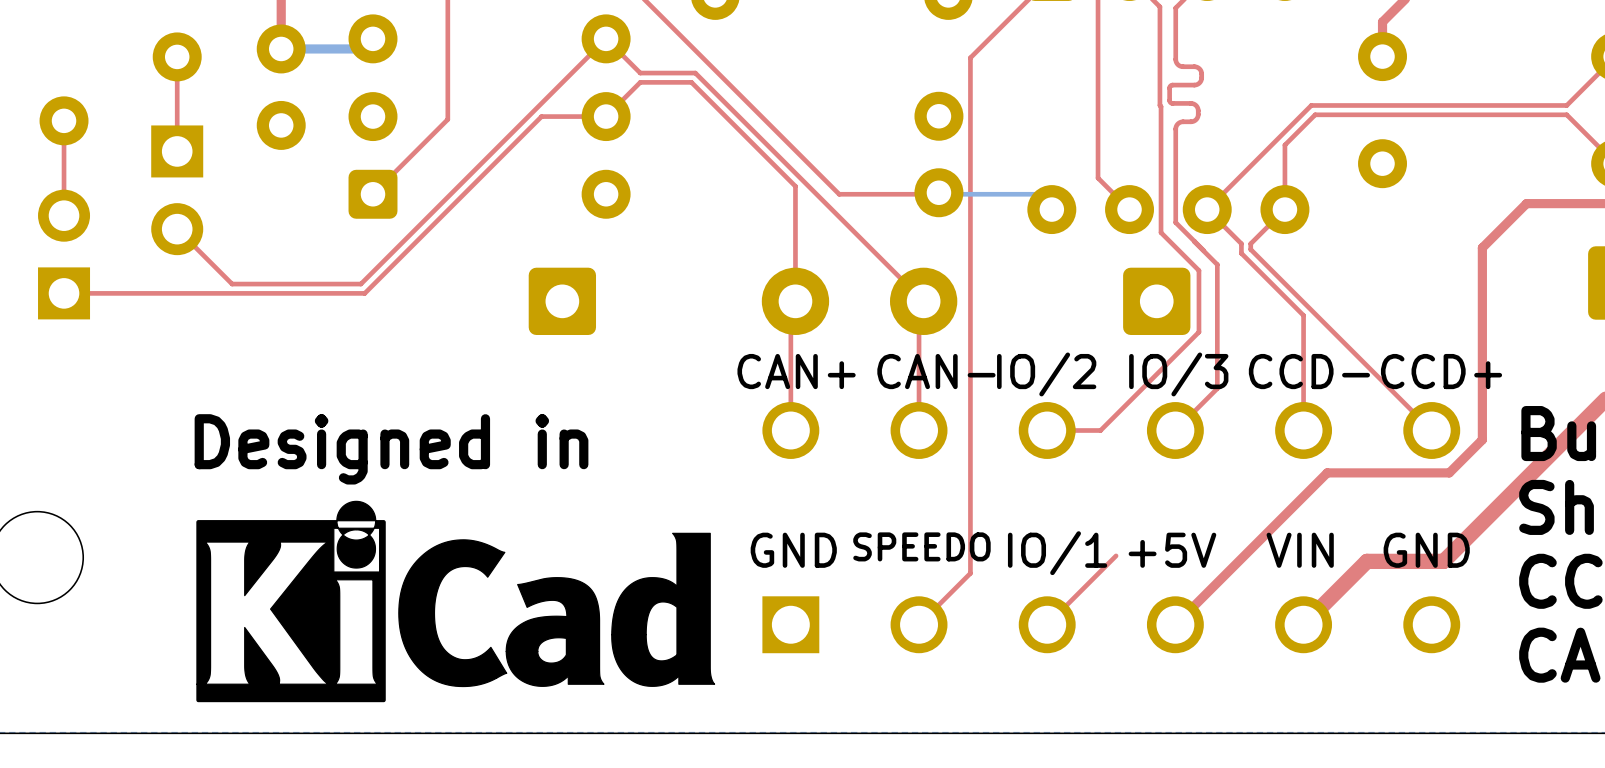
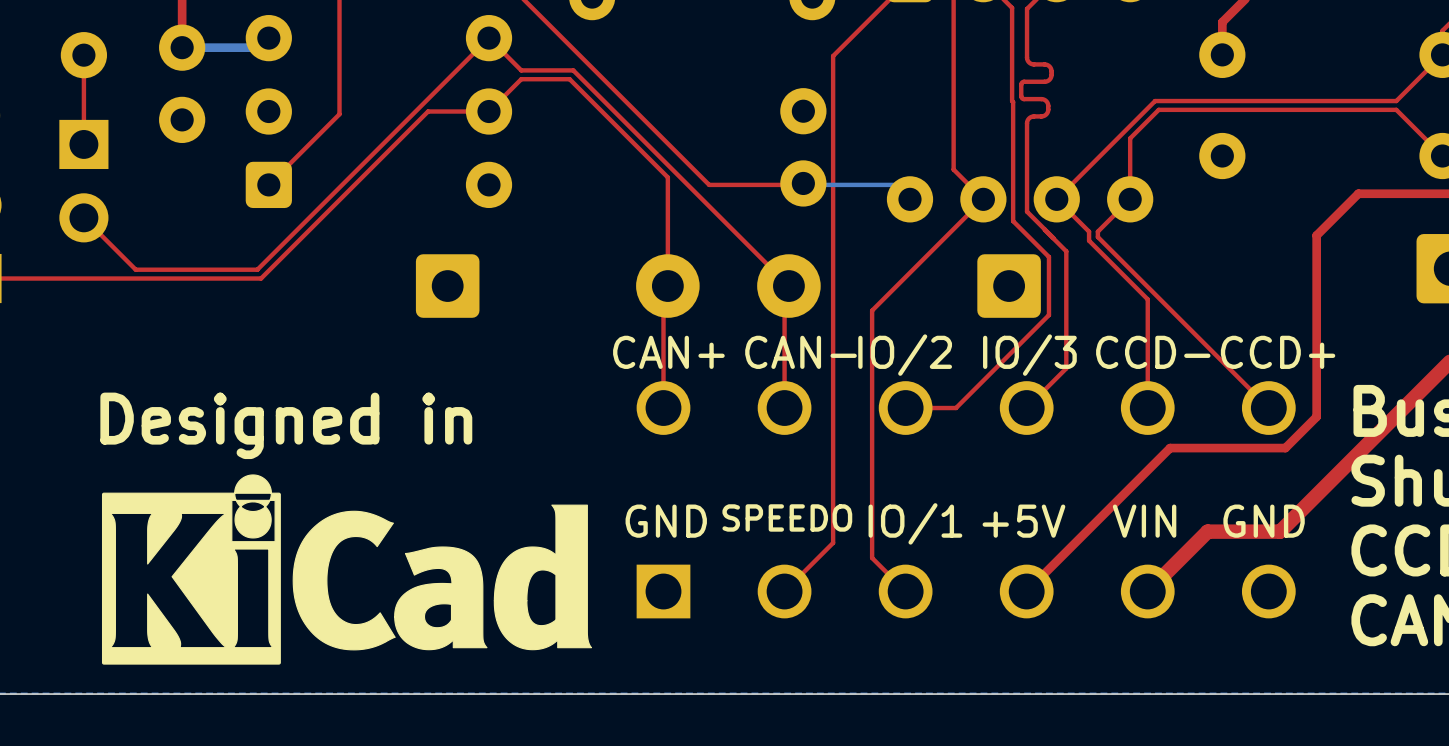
top track: (1116, 555) (1047, 624) -> (983, 199) (872, 310) (872, 558) (905, 591)

